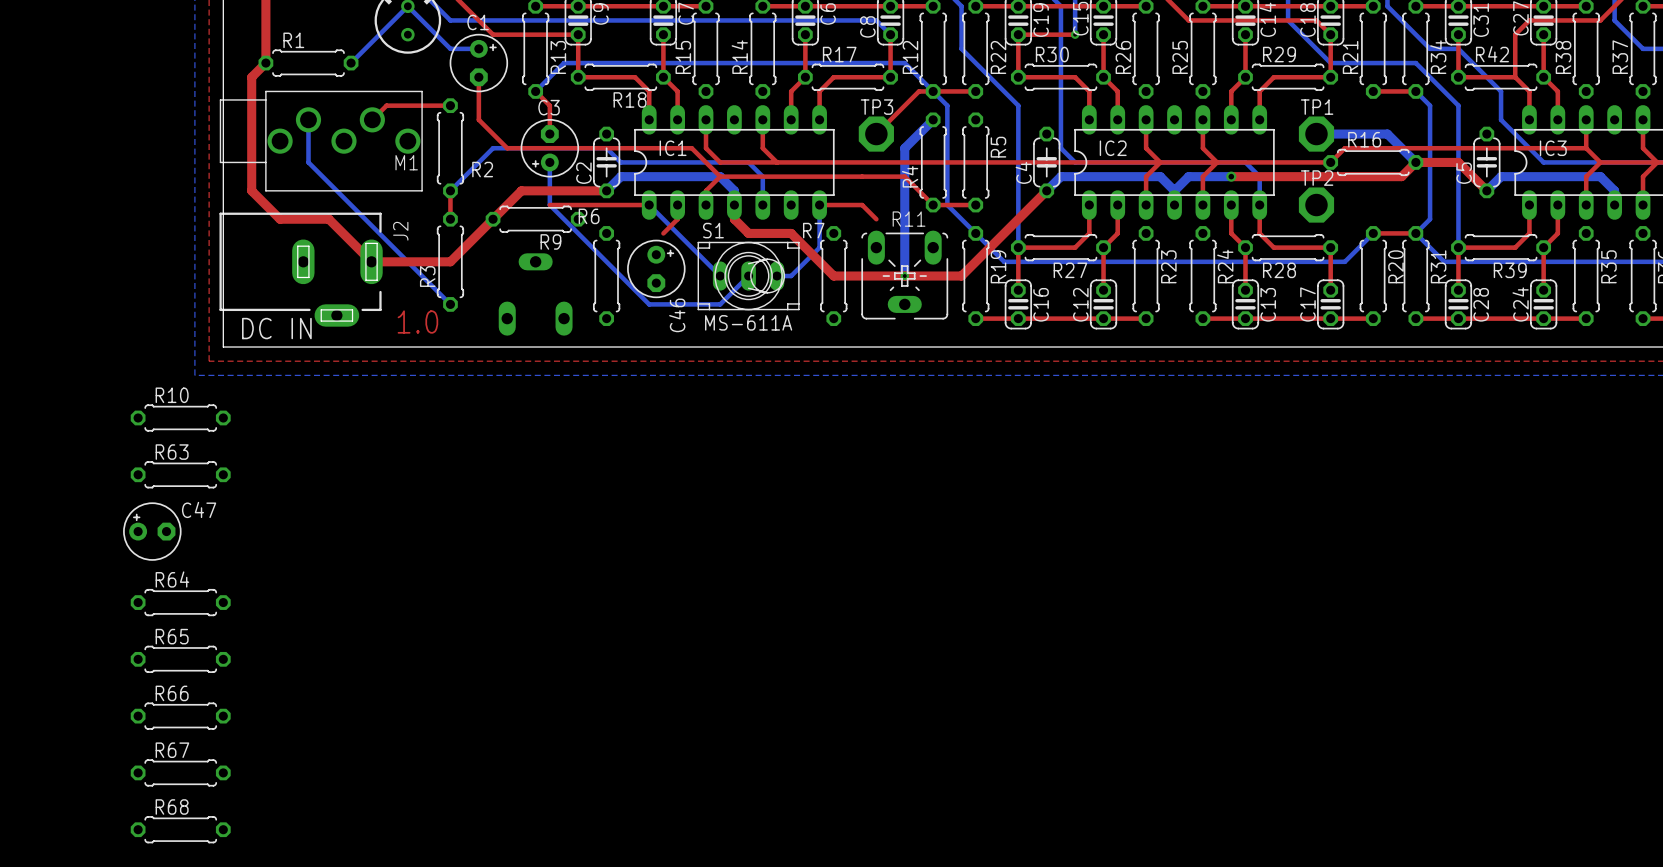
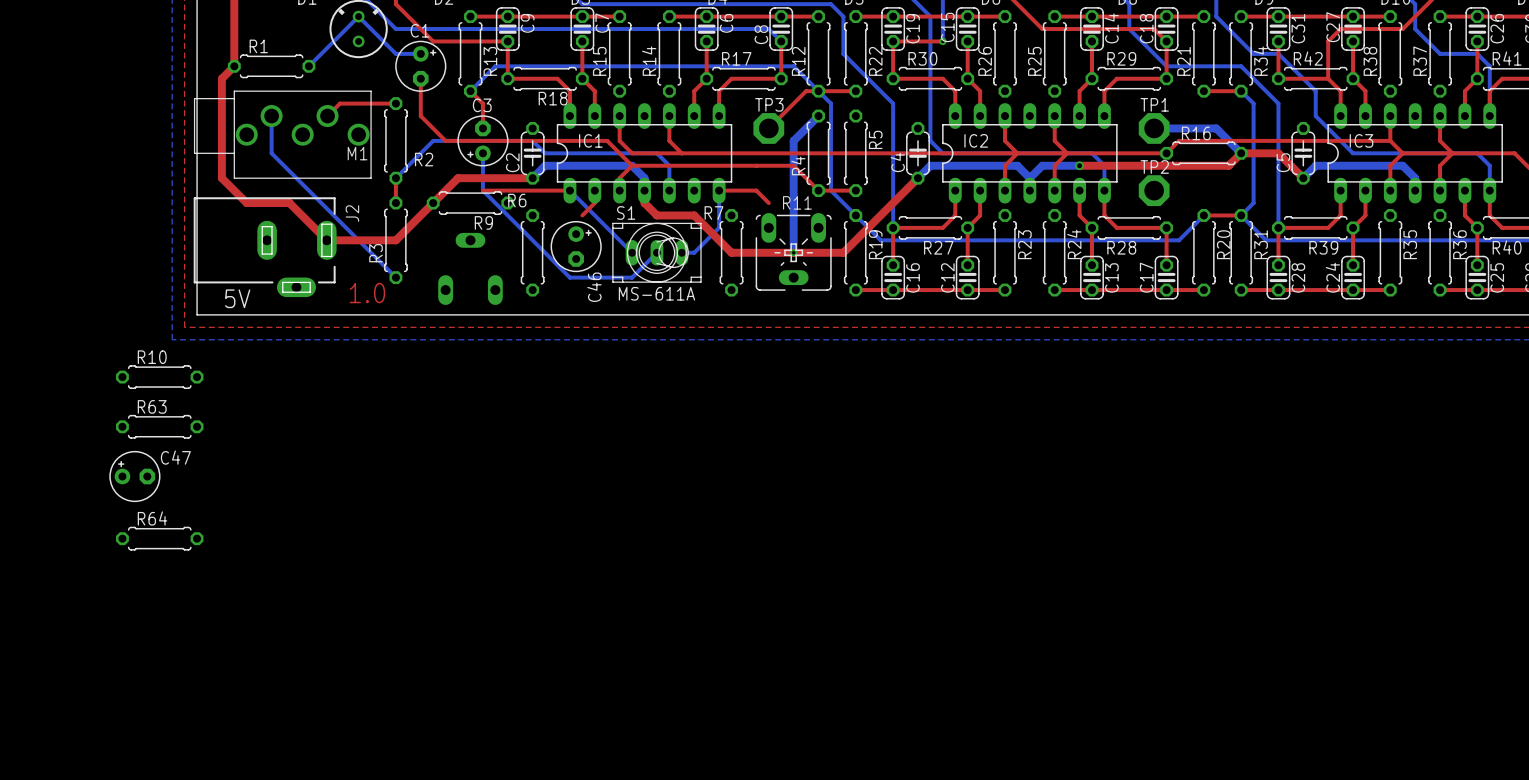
text: none -> 5V (237, 298)
text: DC IN (276, 328) -> none
R65: (180, 659) -> none
R66: (180, 716) -> none
R67: (180, 772) -> none
R68: (180, 829) -> none

